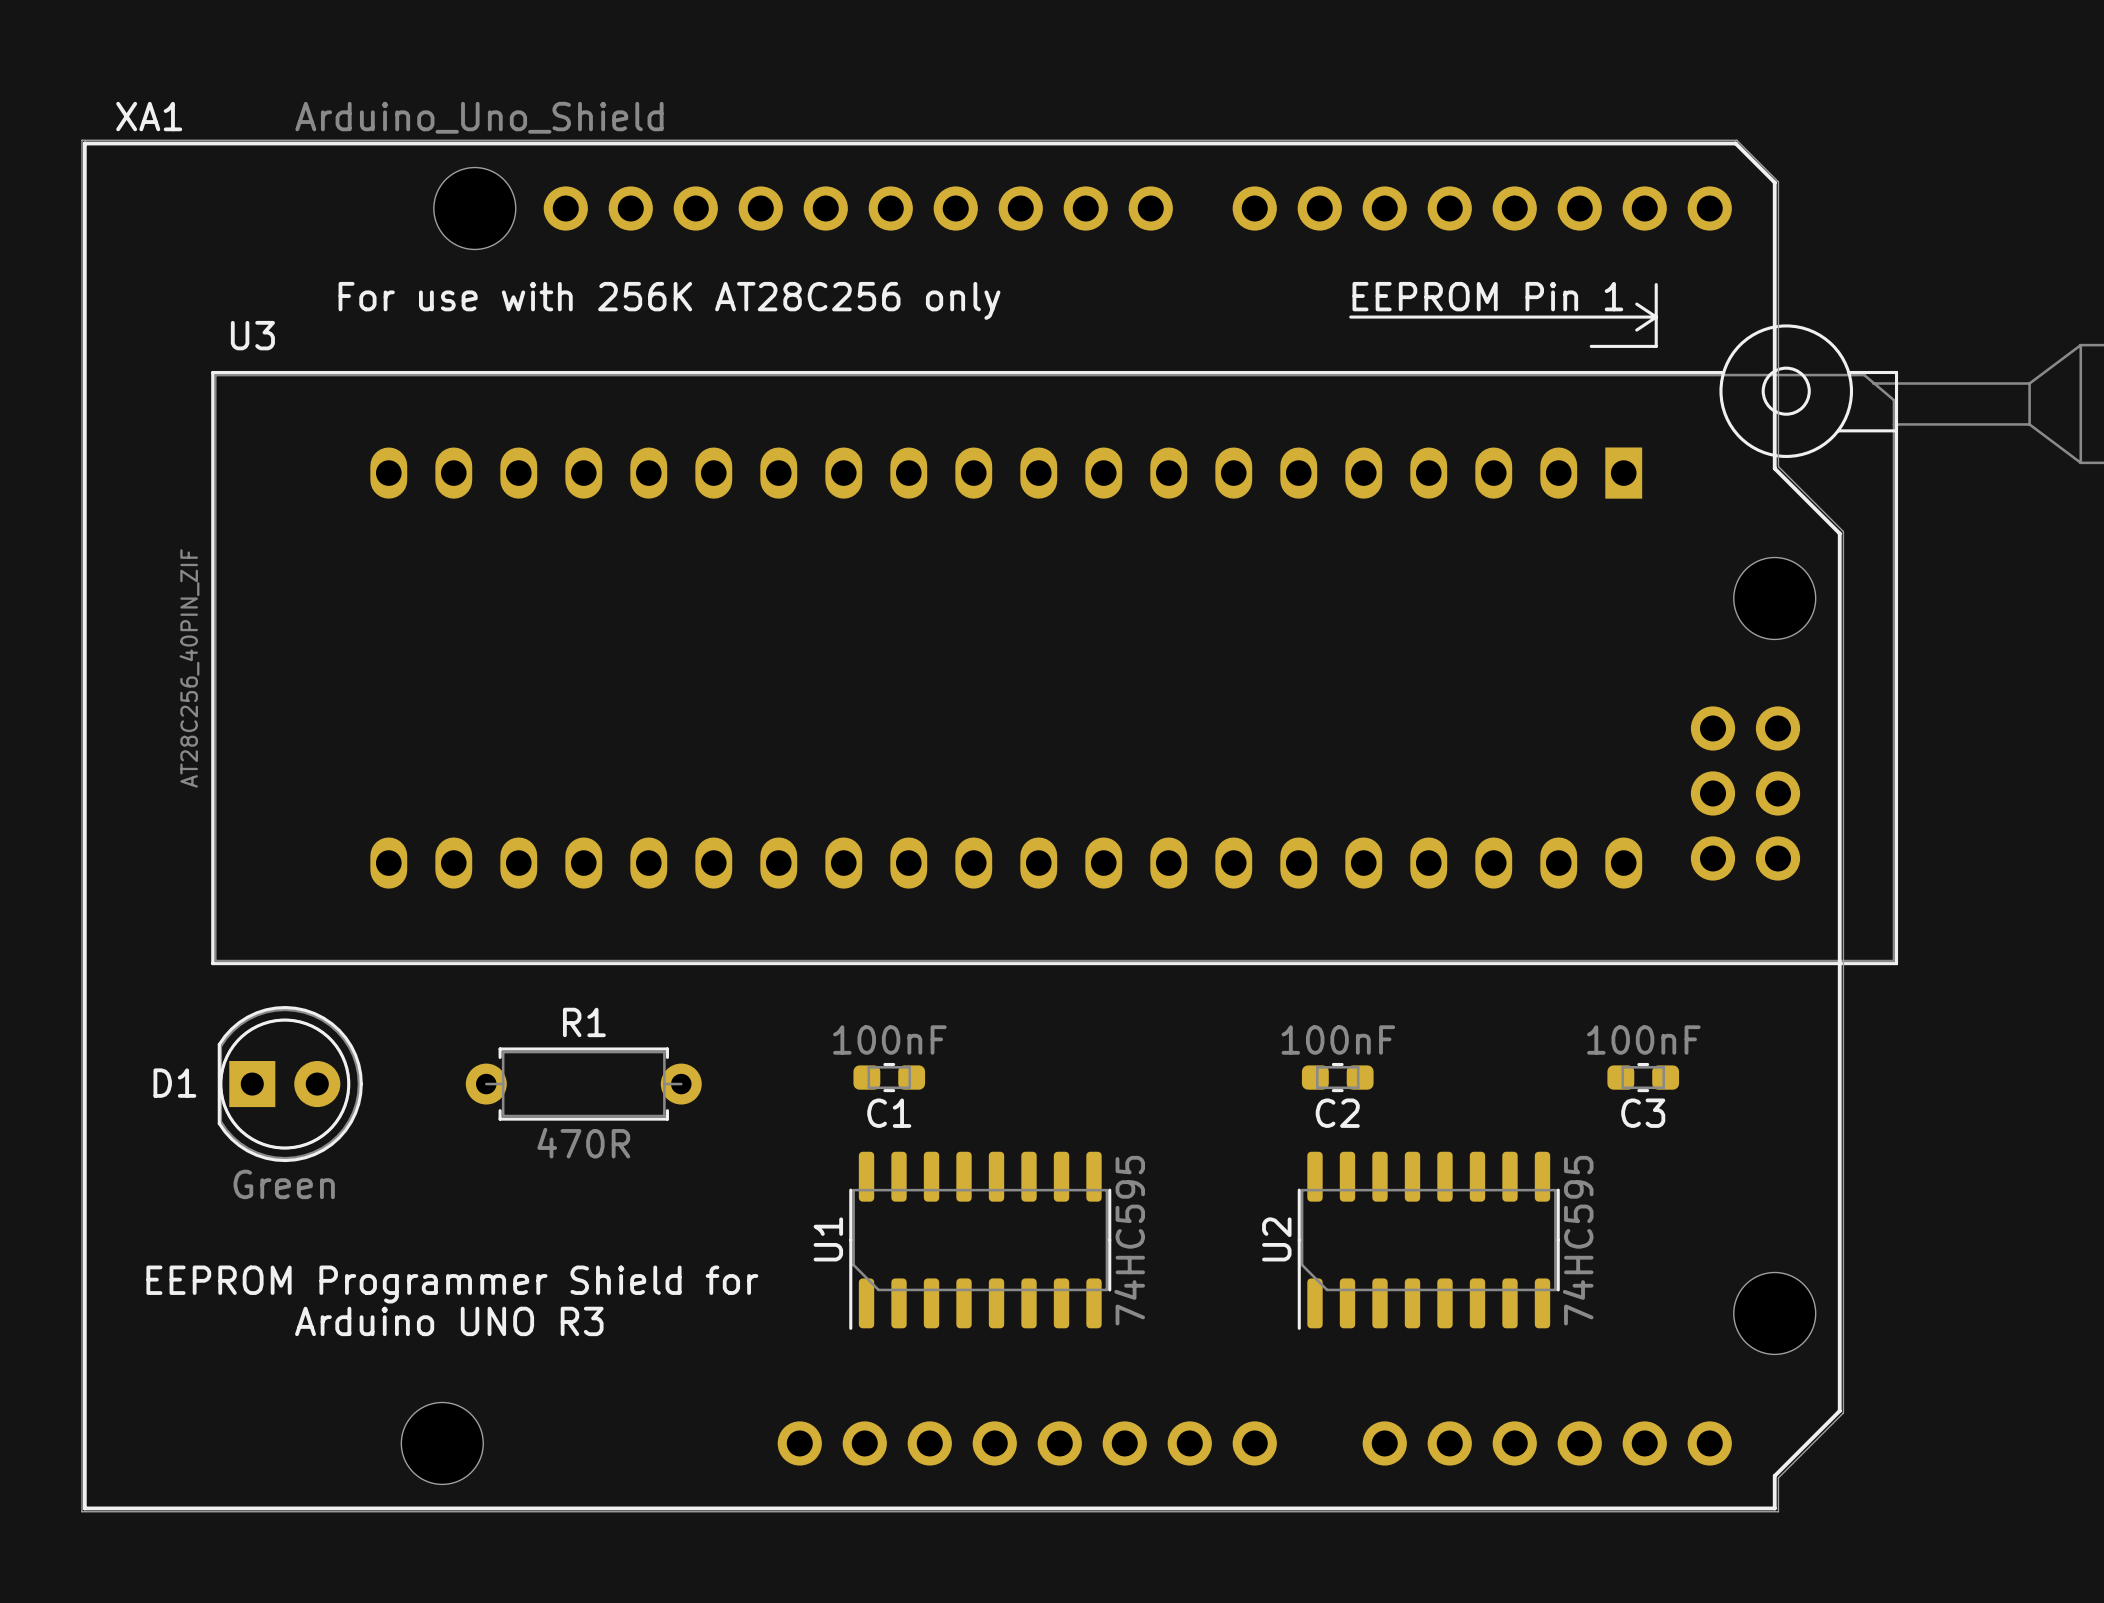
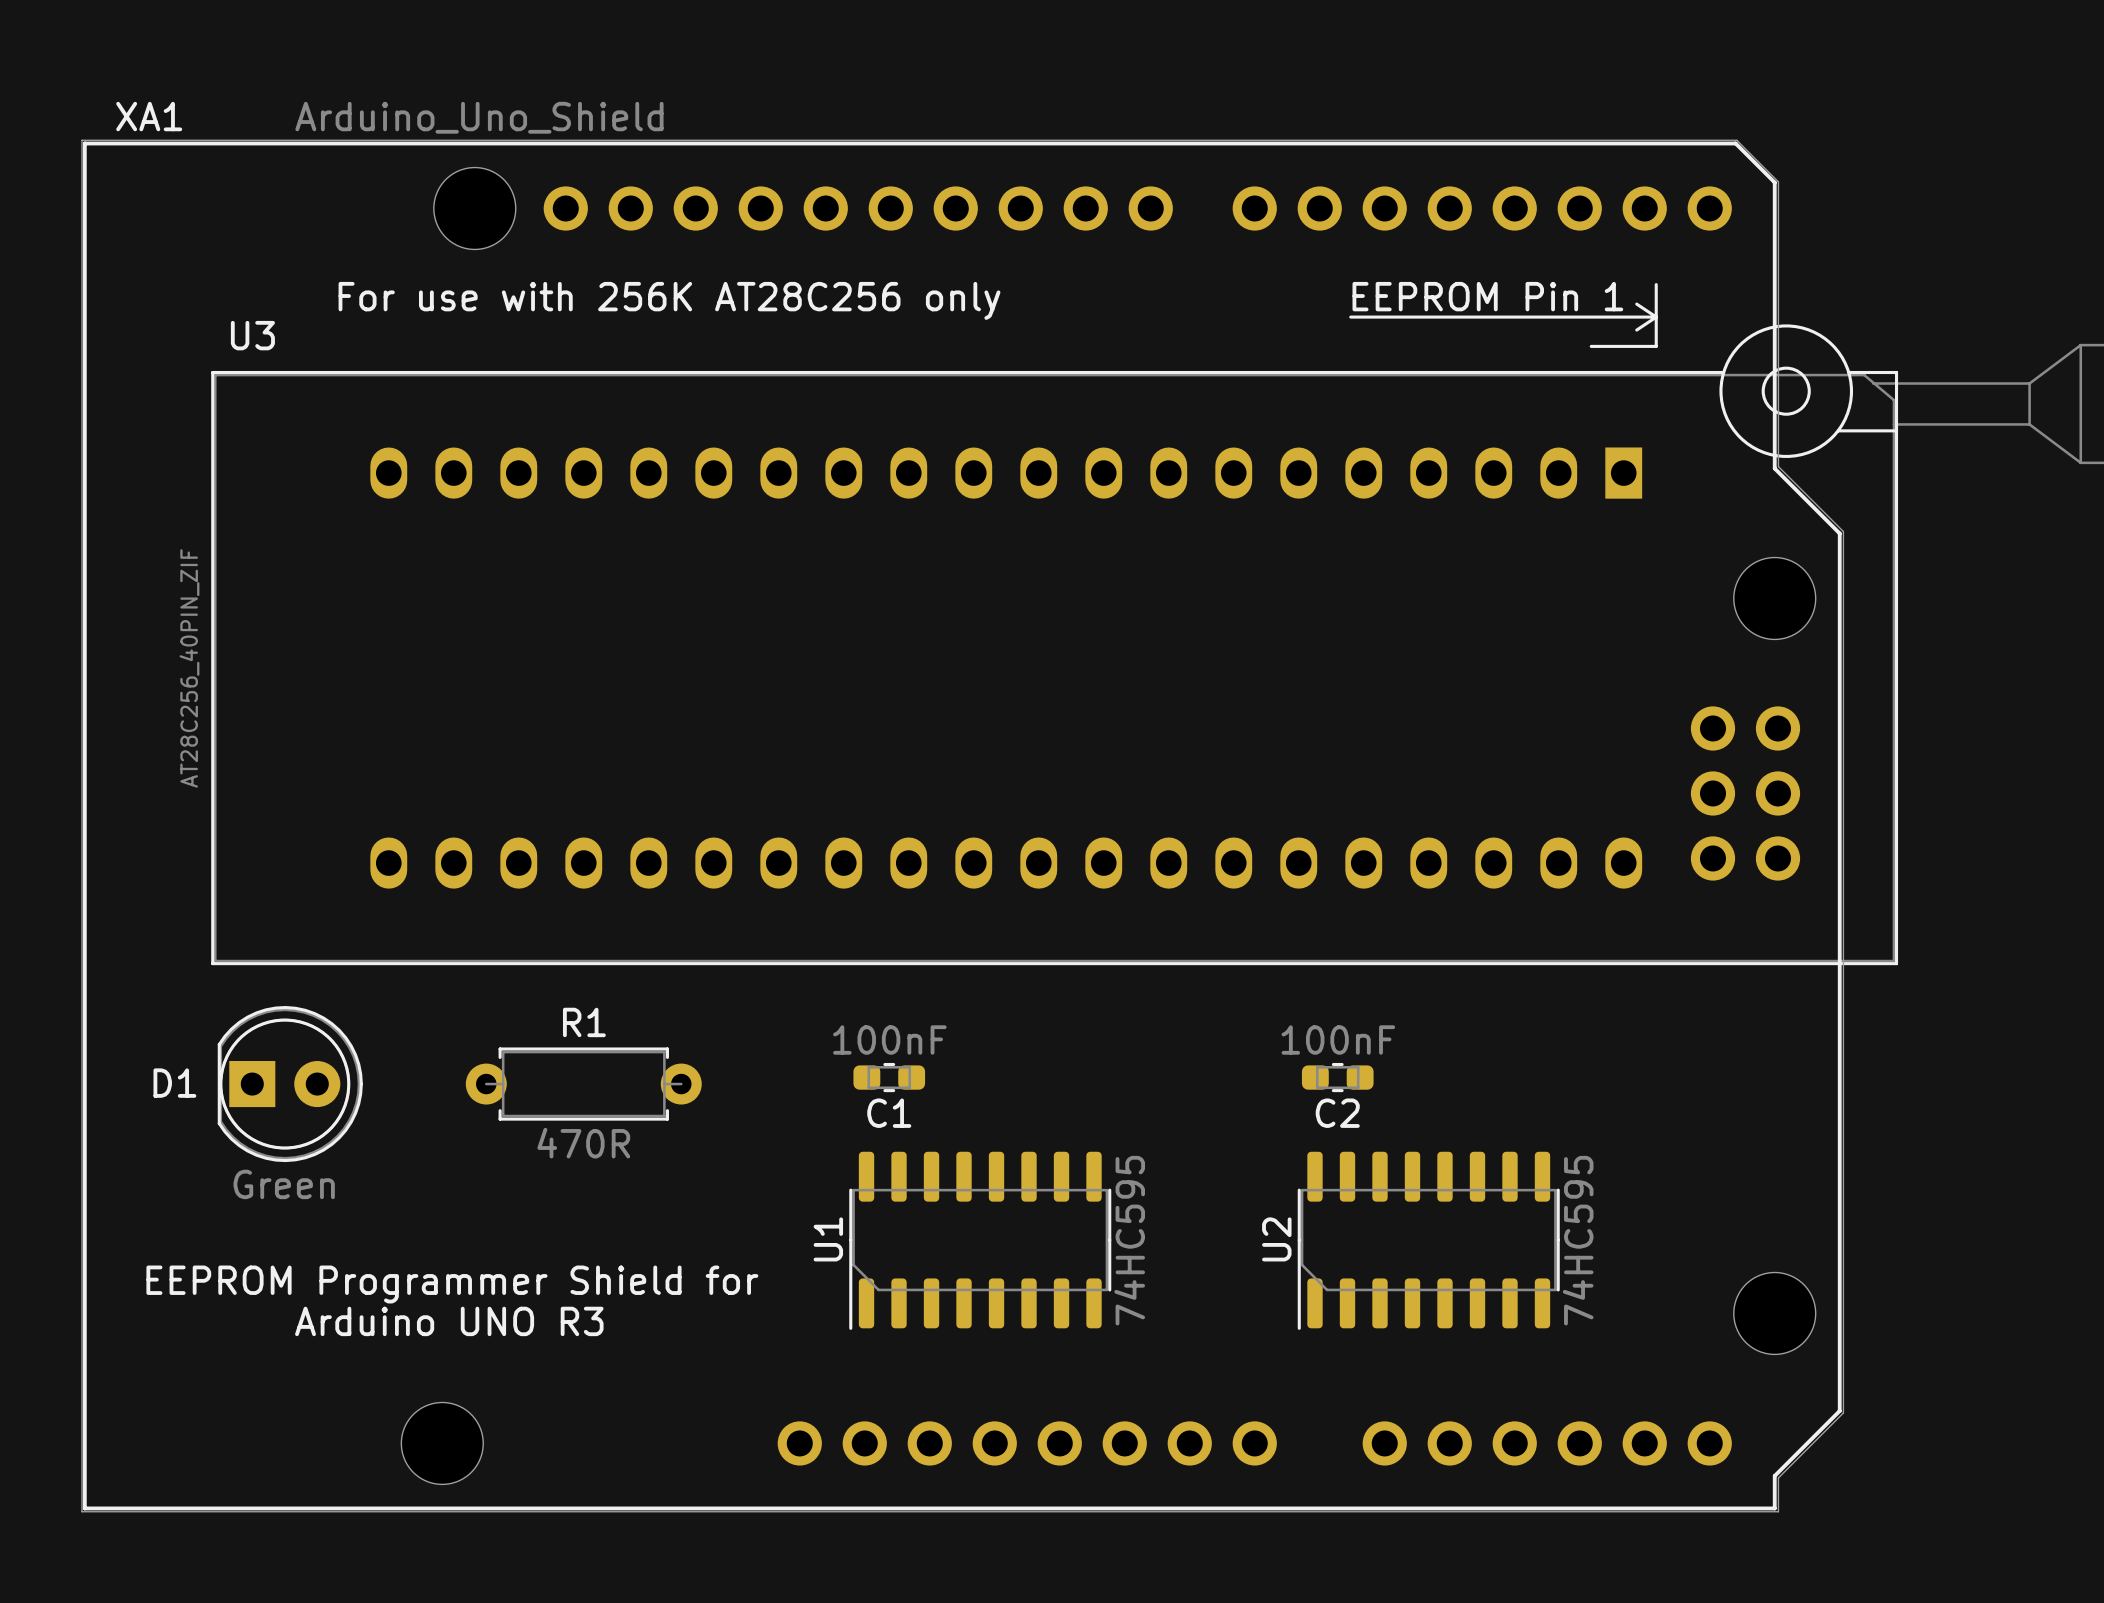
C3: 100nF (1643, 1077) -> none

